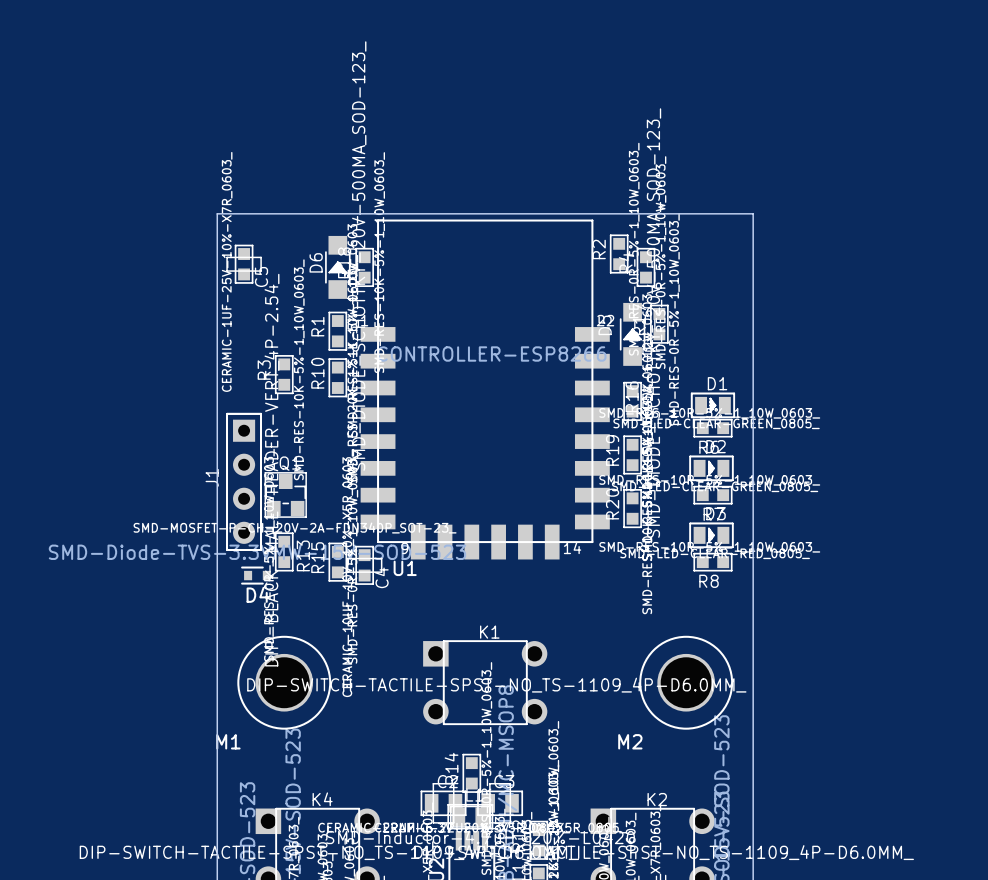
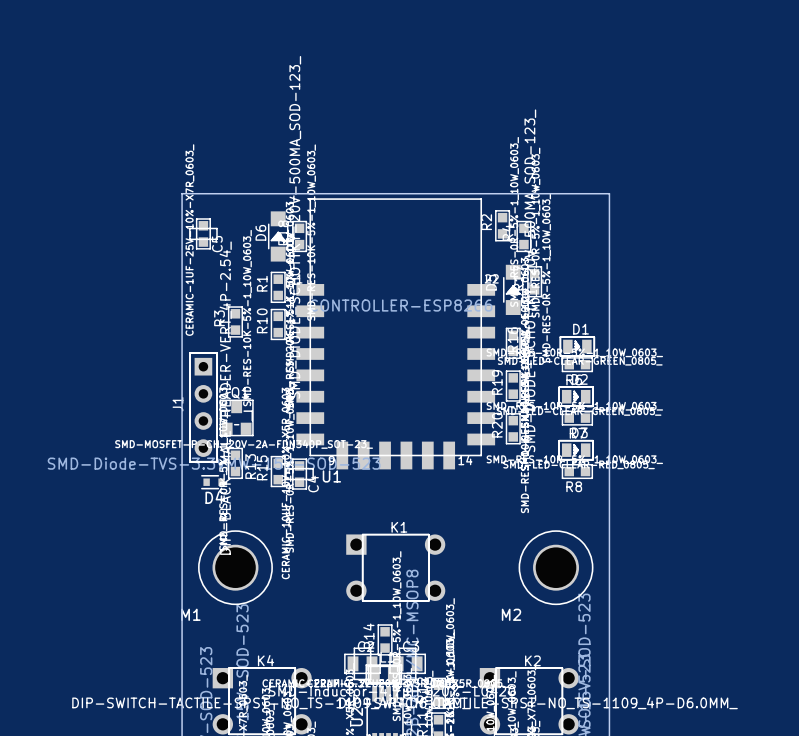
K1 value: DIP-SWITCH-TACTILE-SPST-NO_TS-1109_4P-D6.0MM_ (496, 685) -> none

